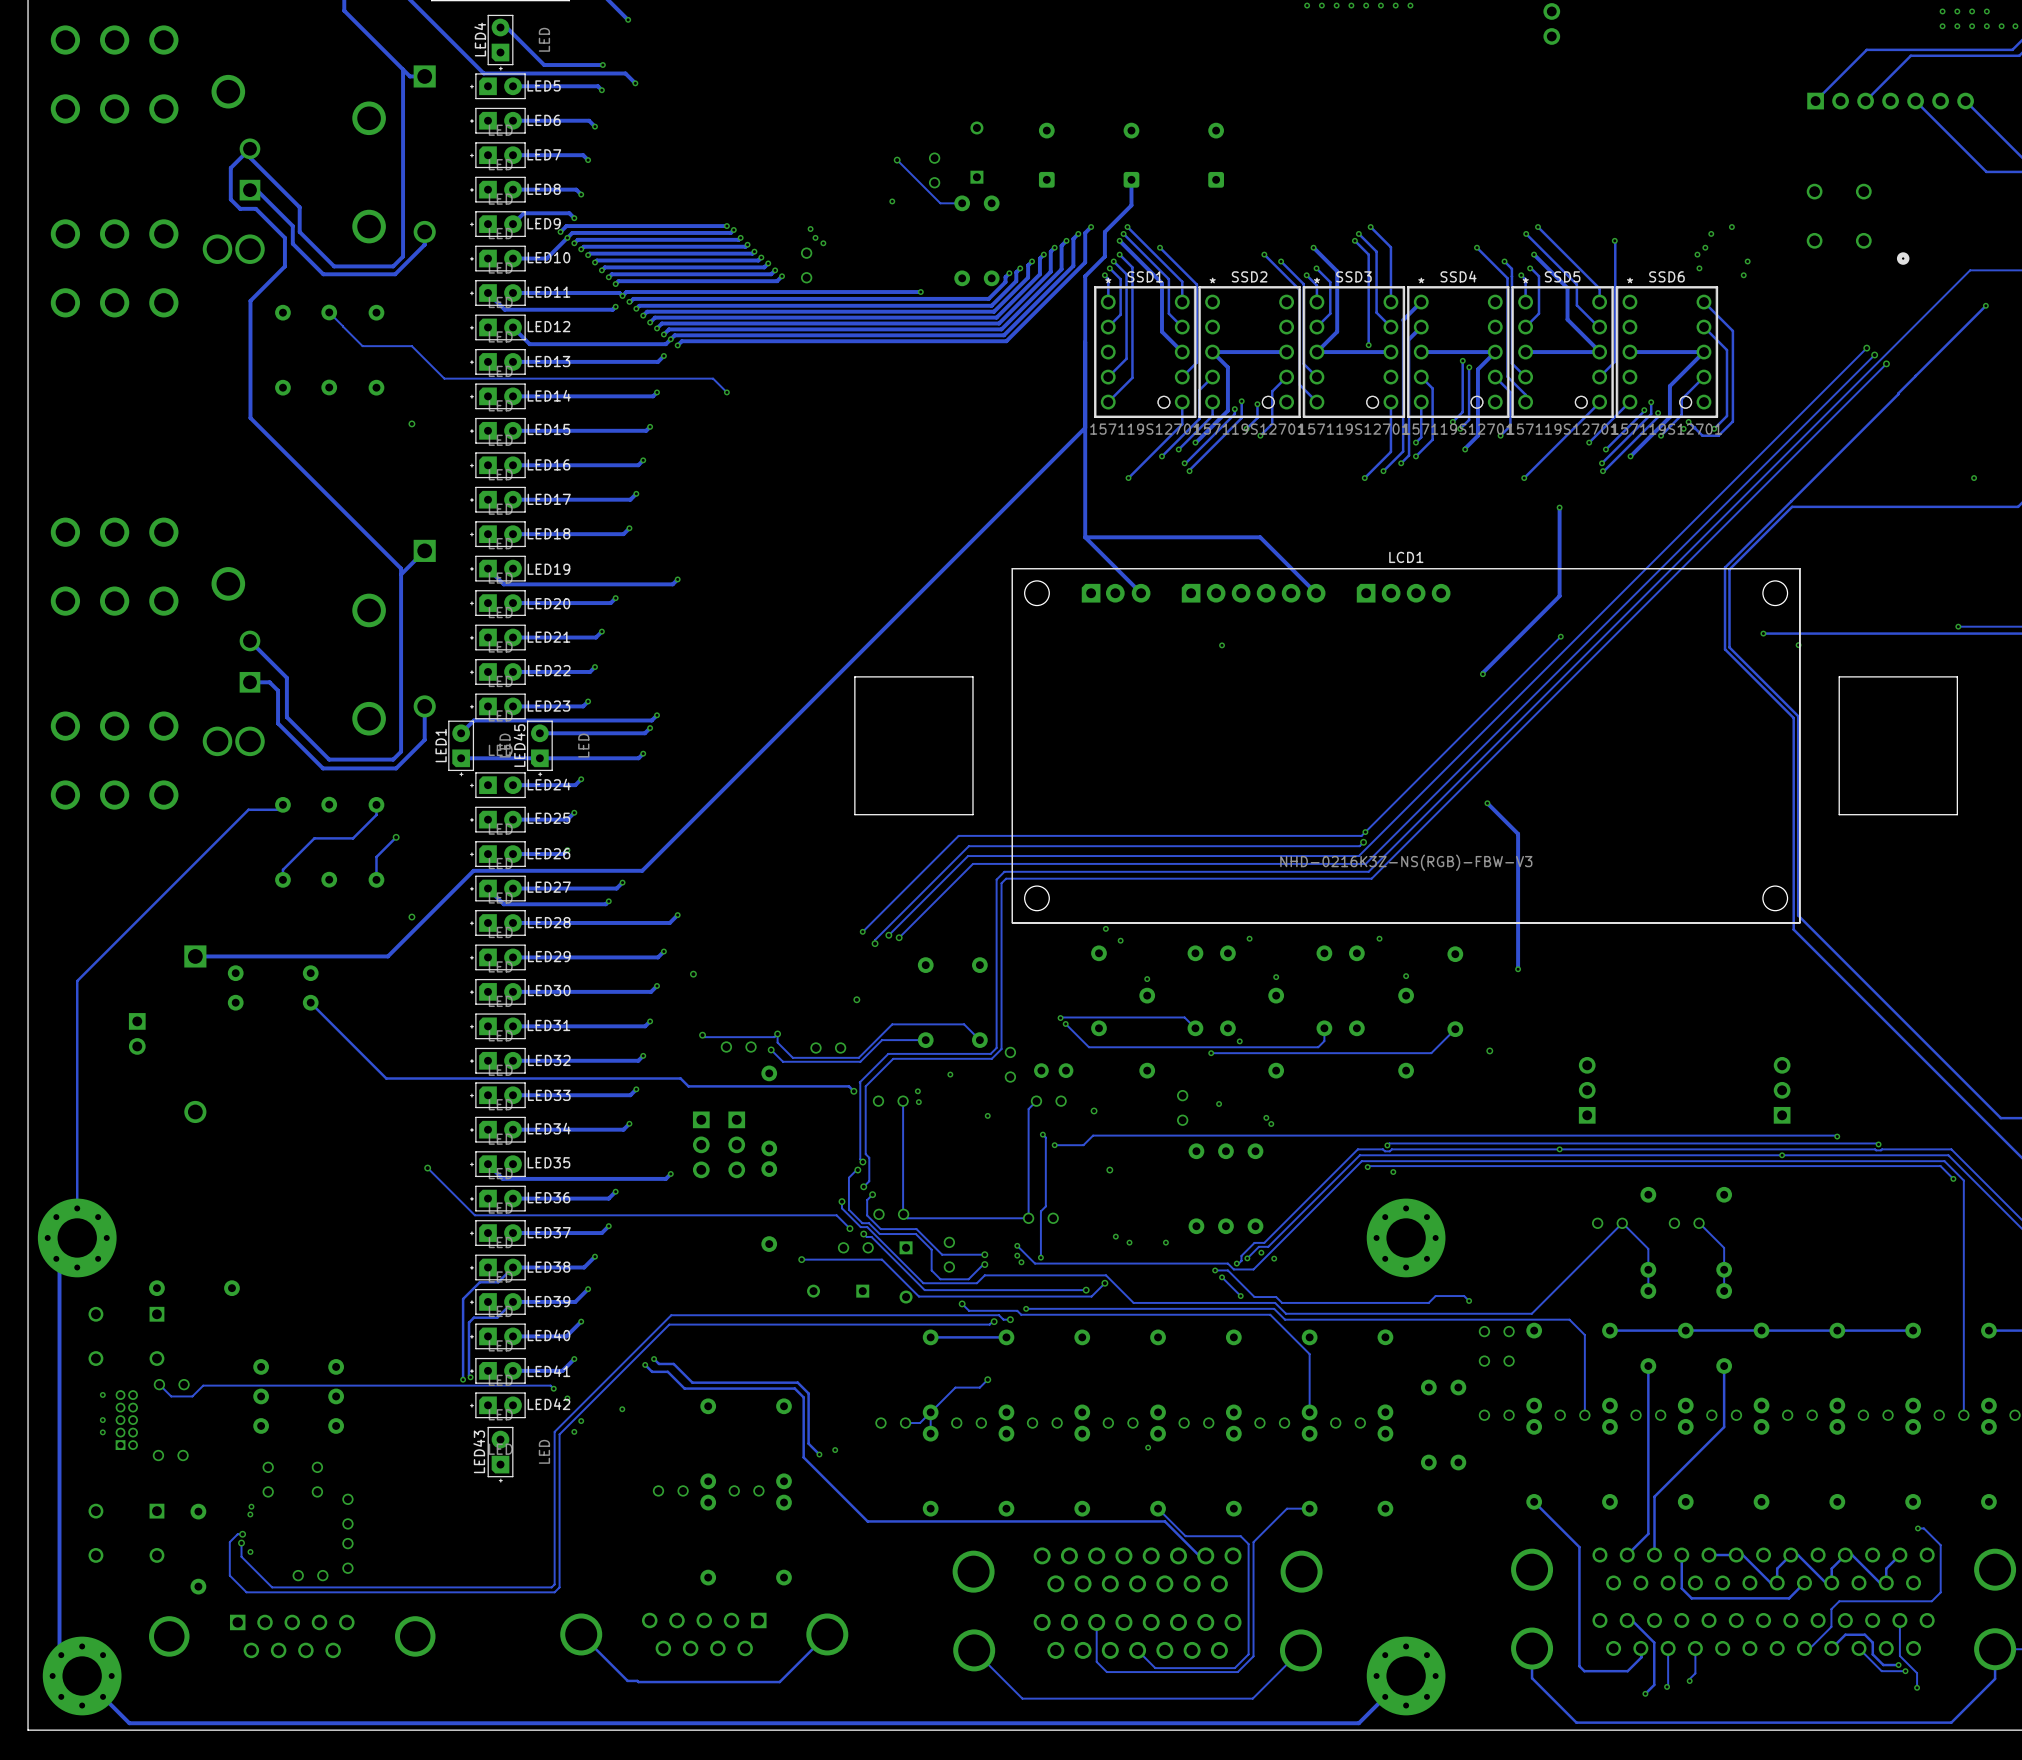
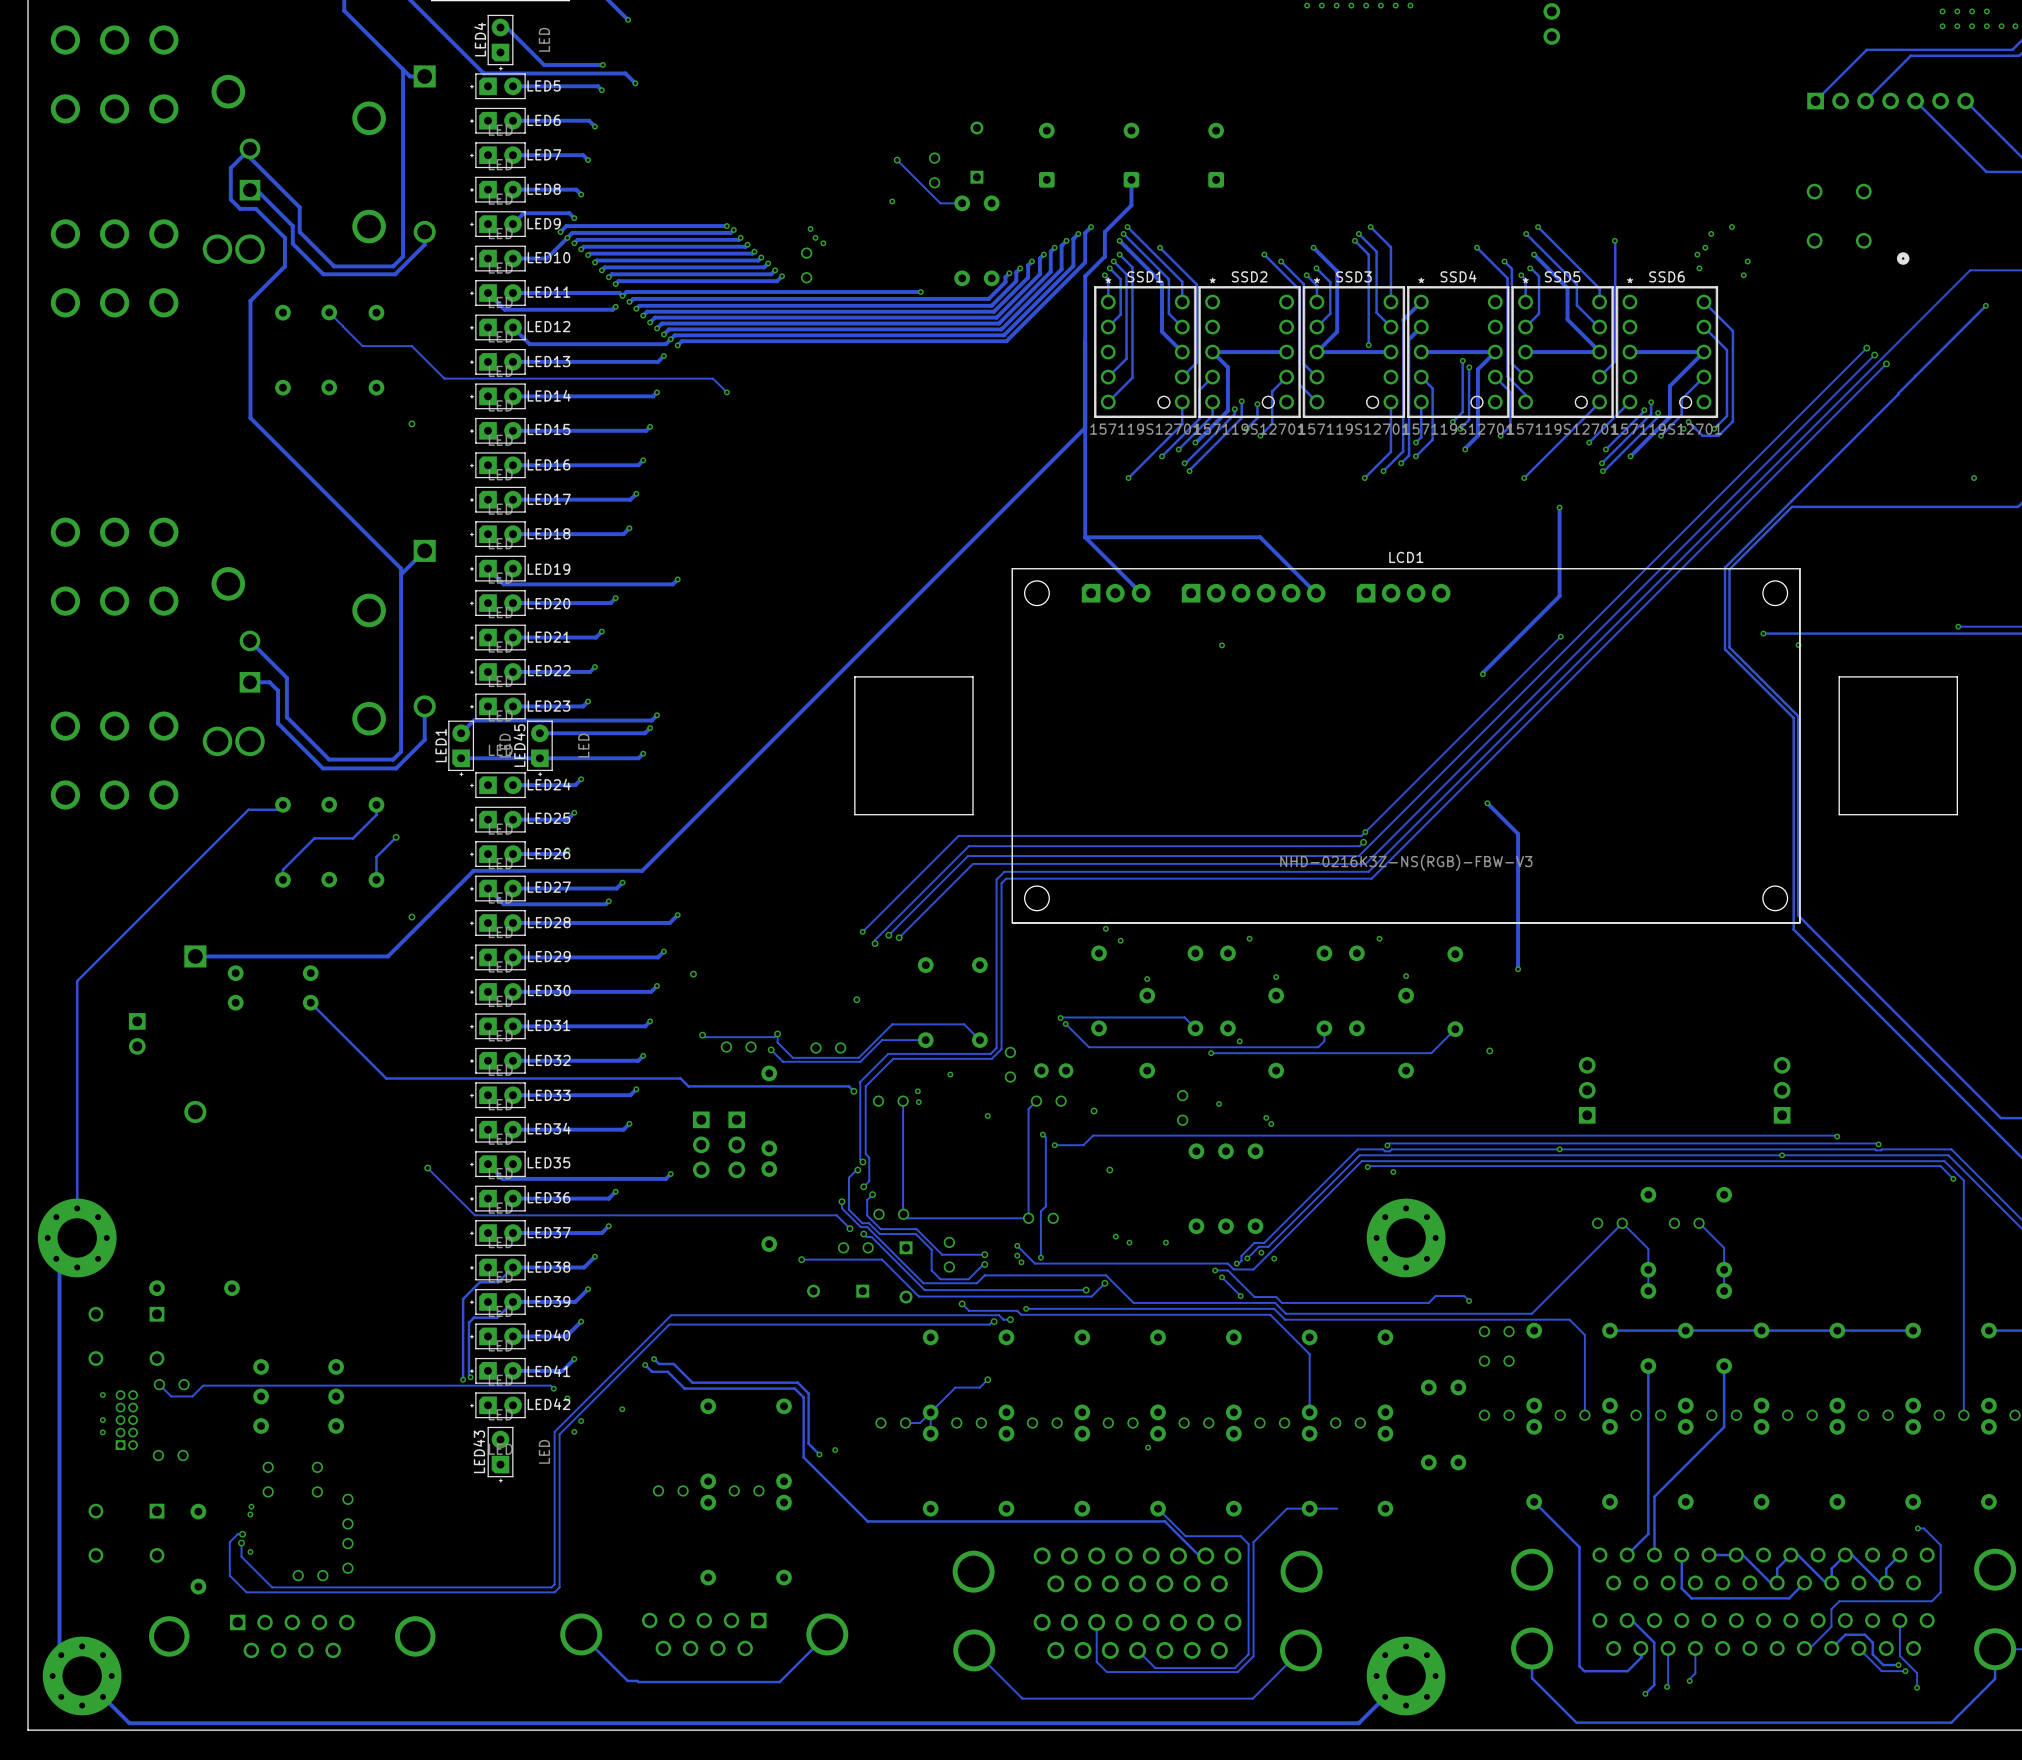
track: (1006, 1337) (930, 1337) -> none
track: none -> (1337, 1508) (1309, 1508)

